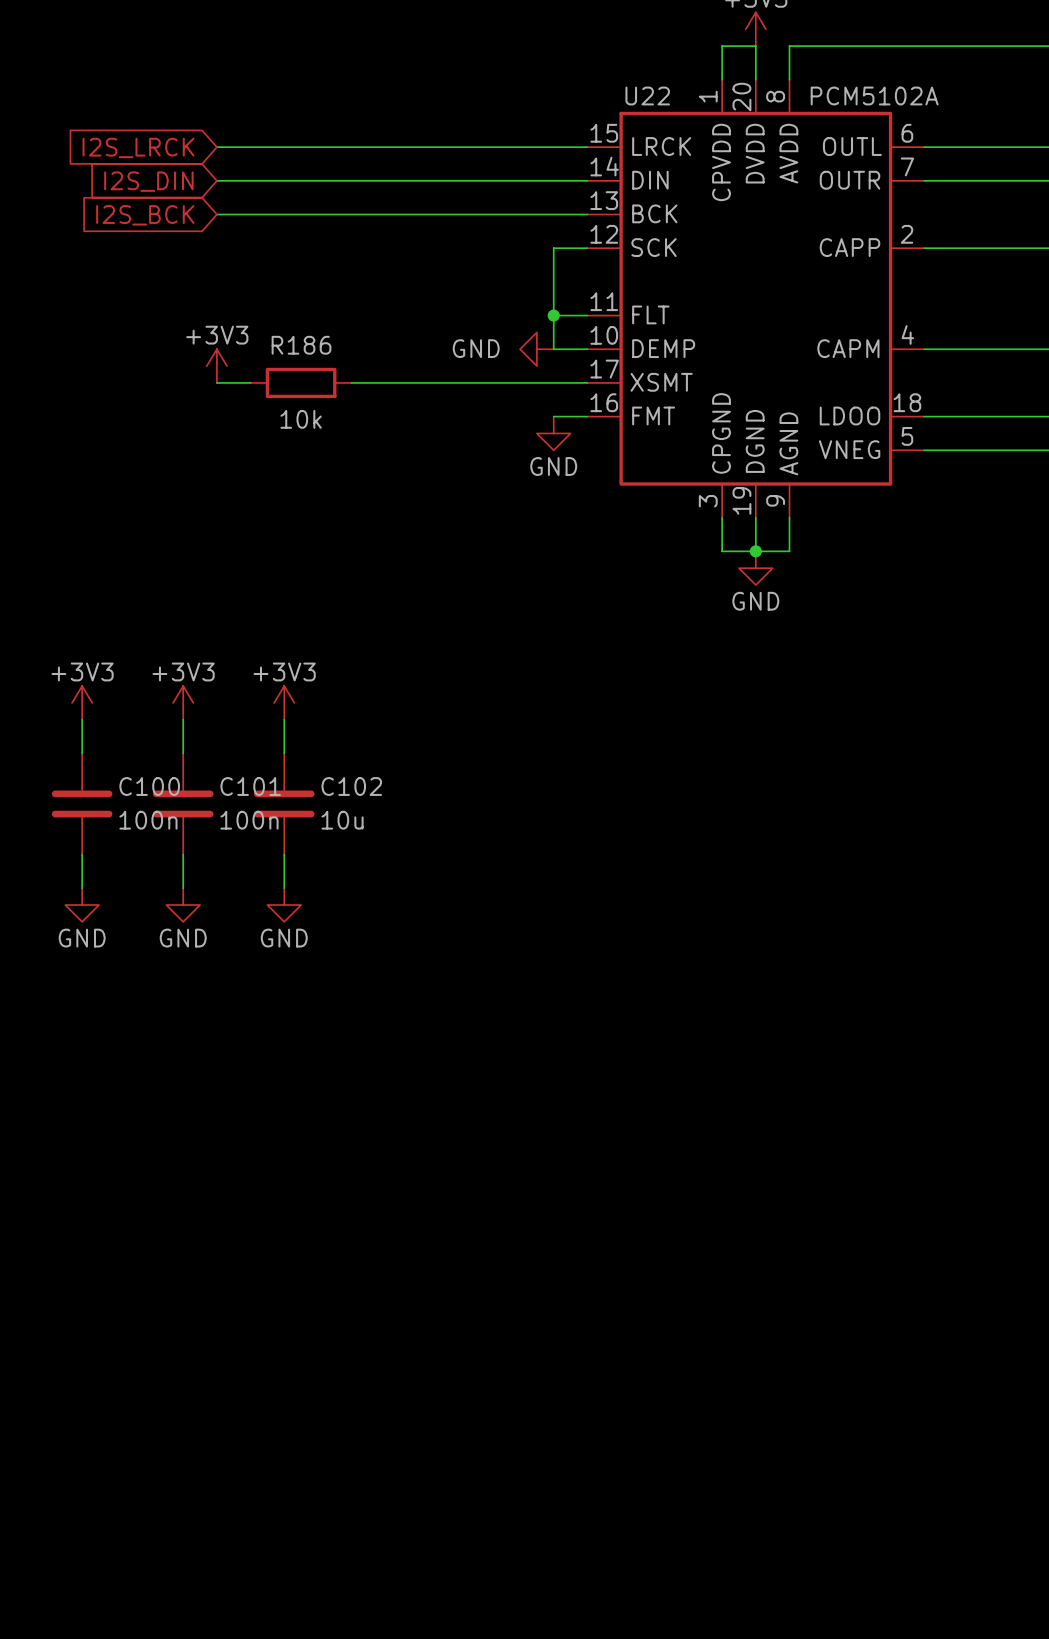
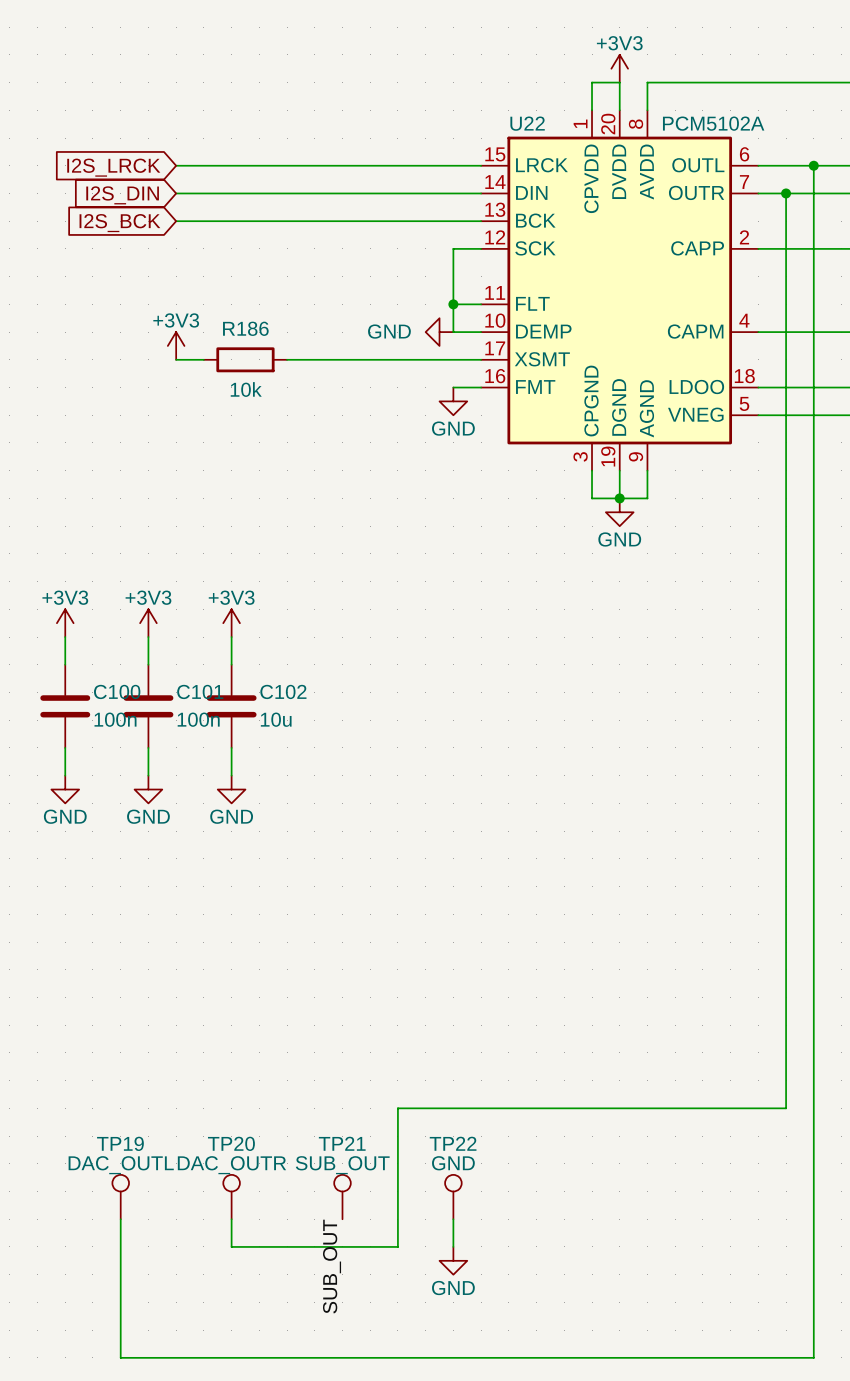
wire: none -> (813, 165) (813, 1357) (120, 1357) (120, 1219)
junction: none -> (813, 165)
wire: none -> (786, 193) (786, 1108) (397, 1108) (397, 1246) (231, 1246) (231, 1219)
junction: none -> (786, 193)
TP19: none -> DAC_OUTL (120, 1197)
TP20: none -> DAC_OUTR (231, 1197)
TP21: none -> SUB_OUT (342, 1197)
TP22: none -> GND (453, 1197)
wire: none -> (453, 1219) (453, 1246)
power symbol: none -> GND (453, 1260)
label: none -> SUB_OUT (332, 1266)

